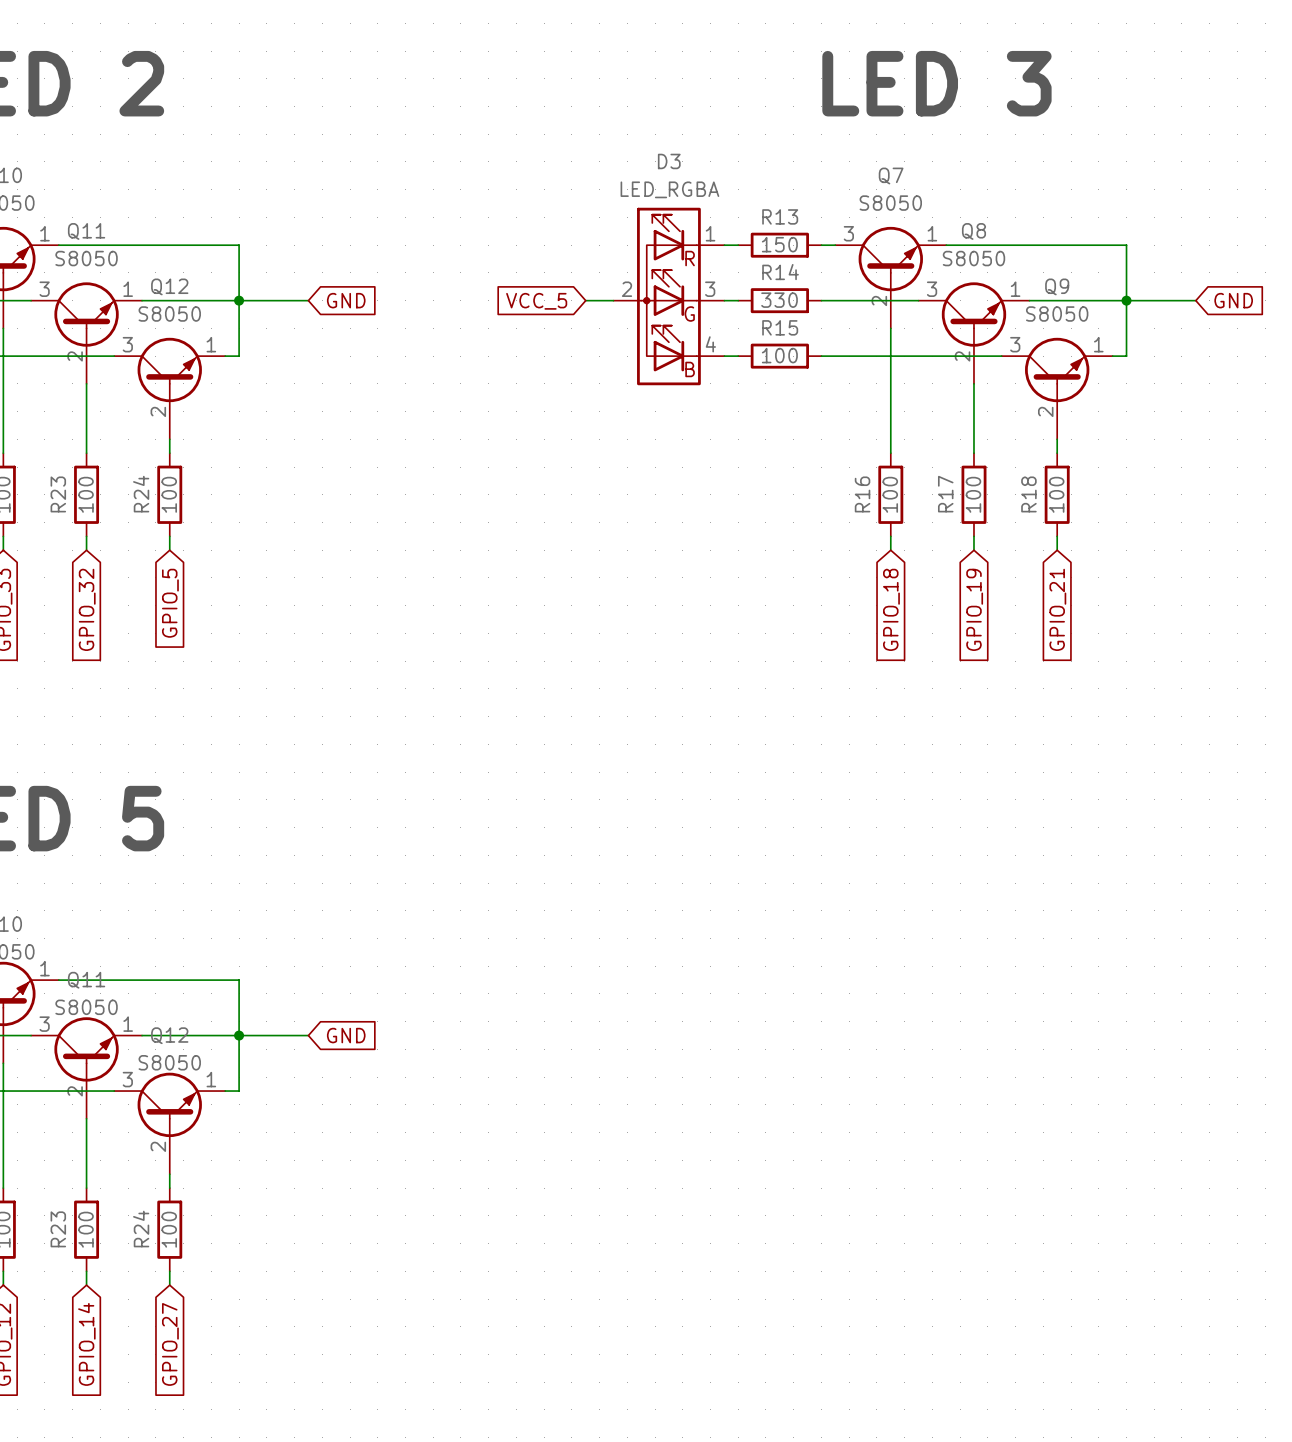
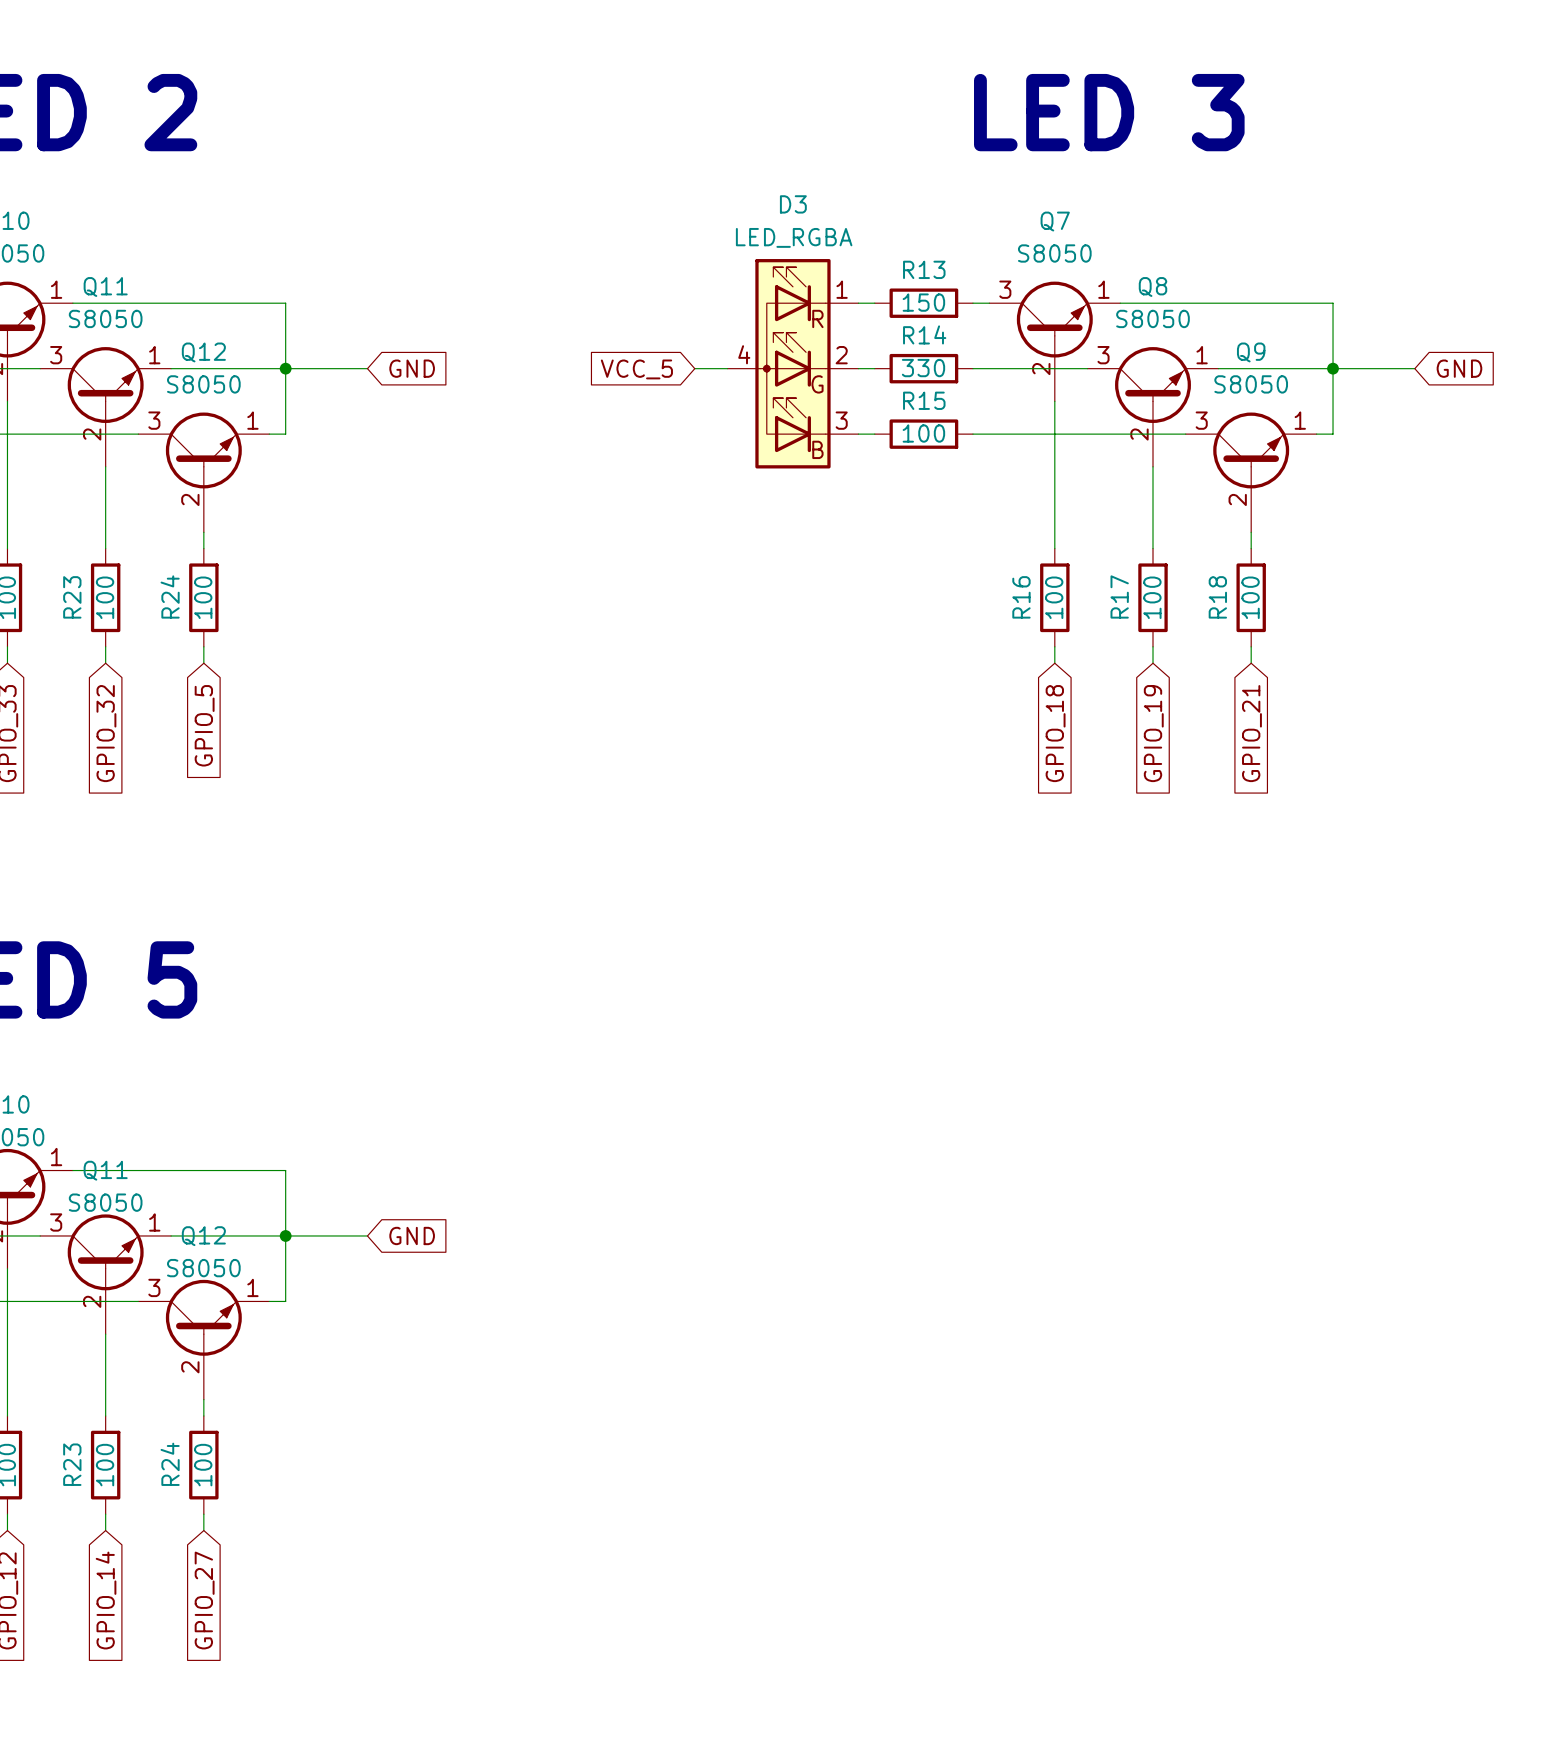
D3 pin number: 2 (627, 289) -> 4 (744, 354)
D3 pin number: 3 (710, 289) -> 2 (841, 355)
D3 pin number: 4 (710, 344) -> 3 (841, 420)

